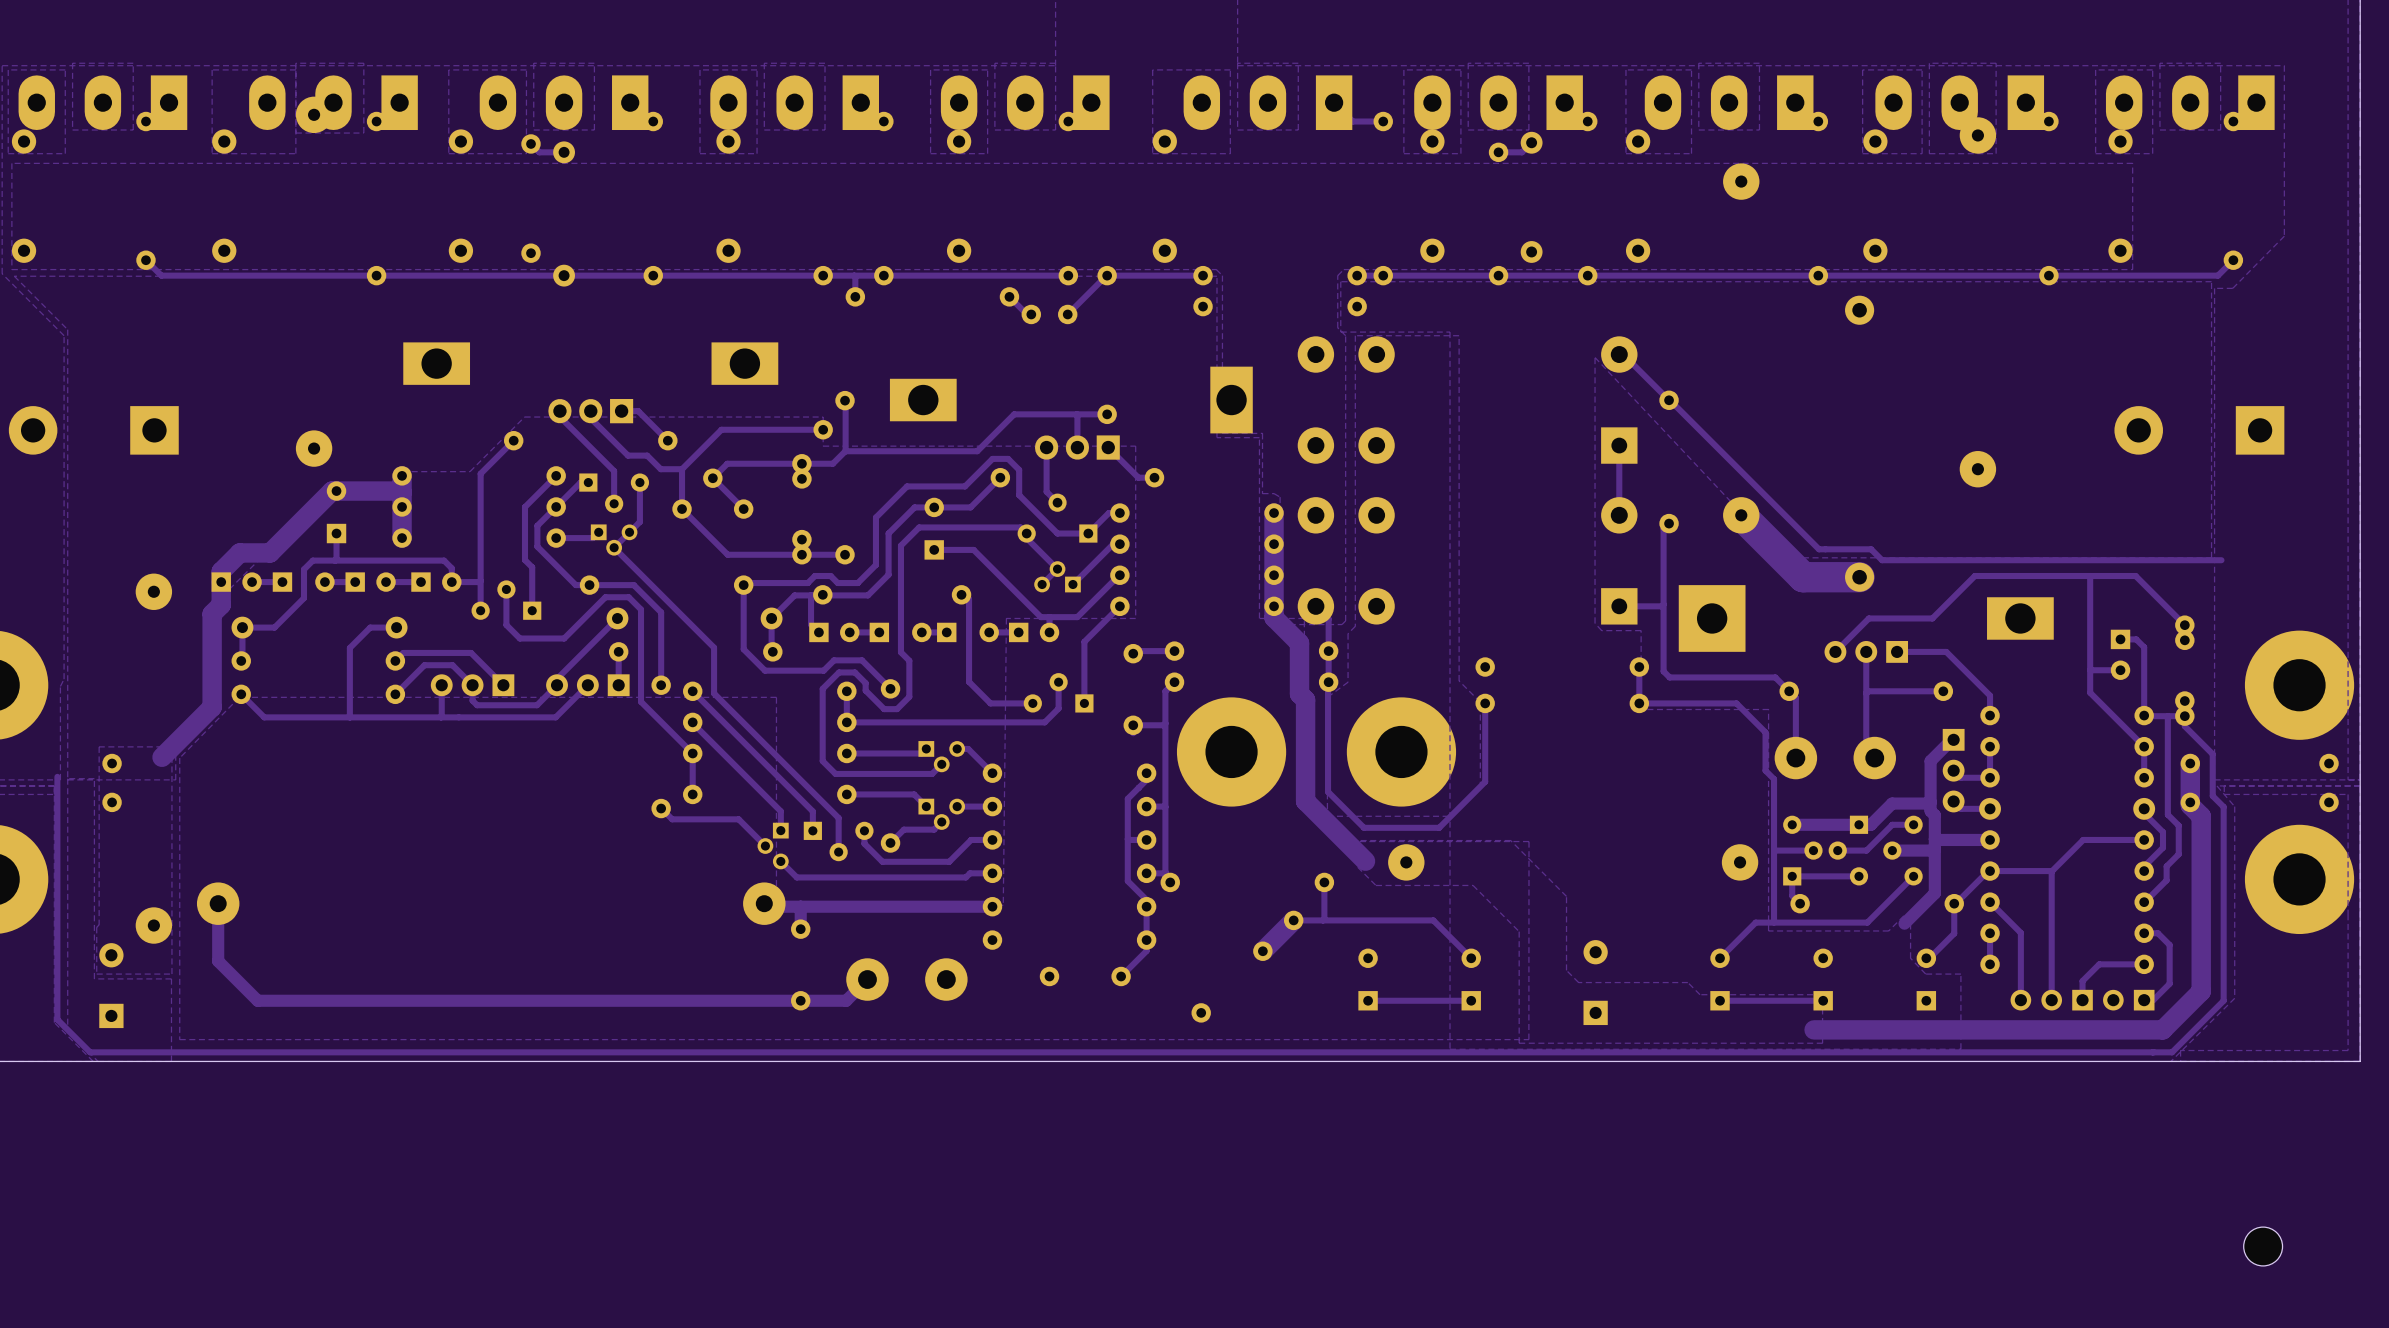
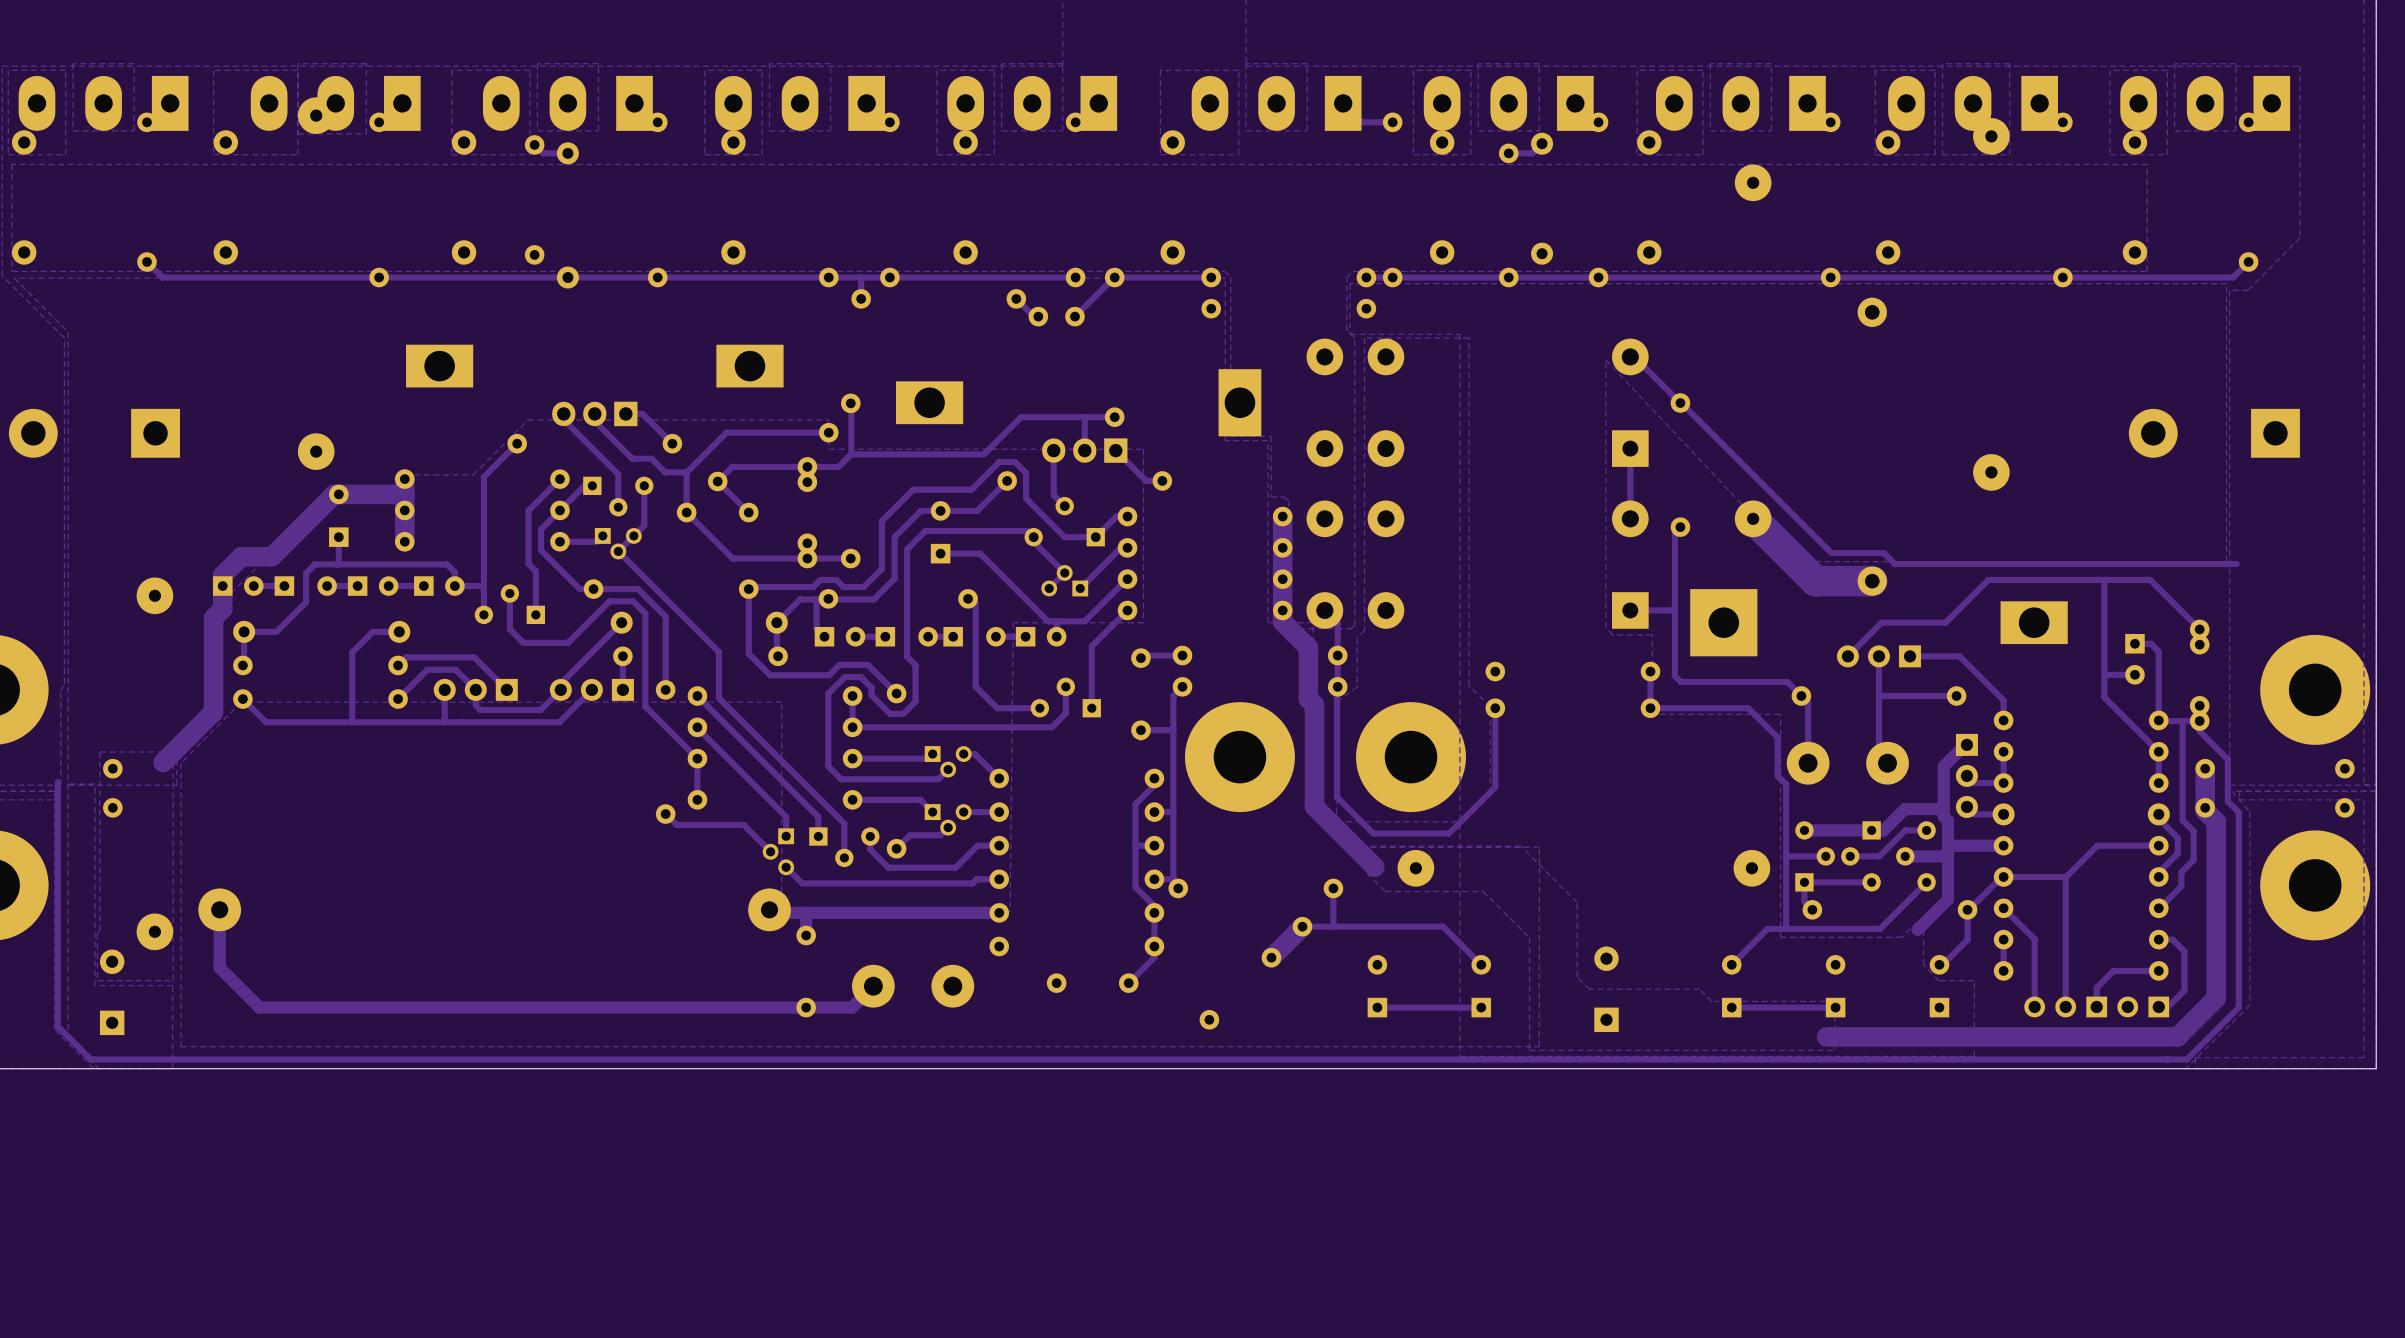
part: (2263, 1246) -> none

